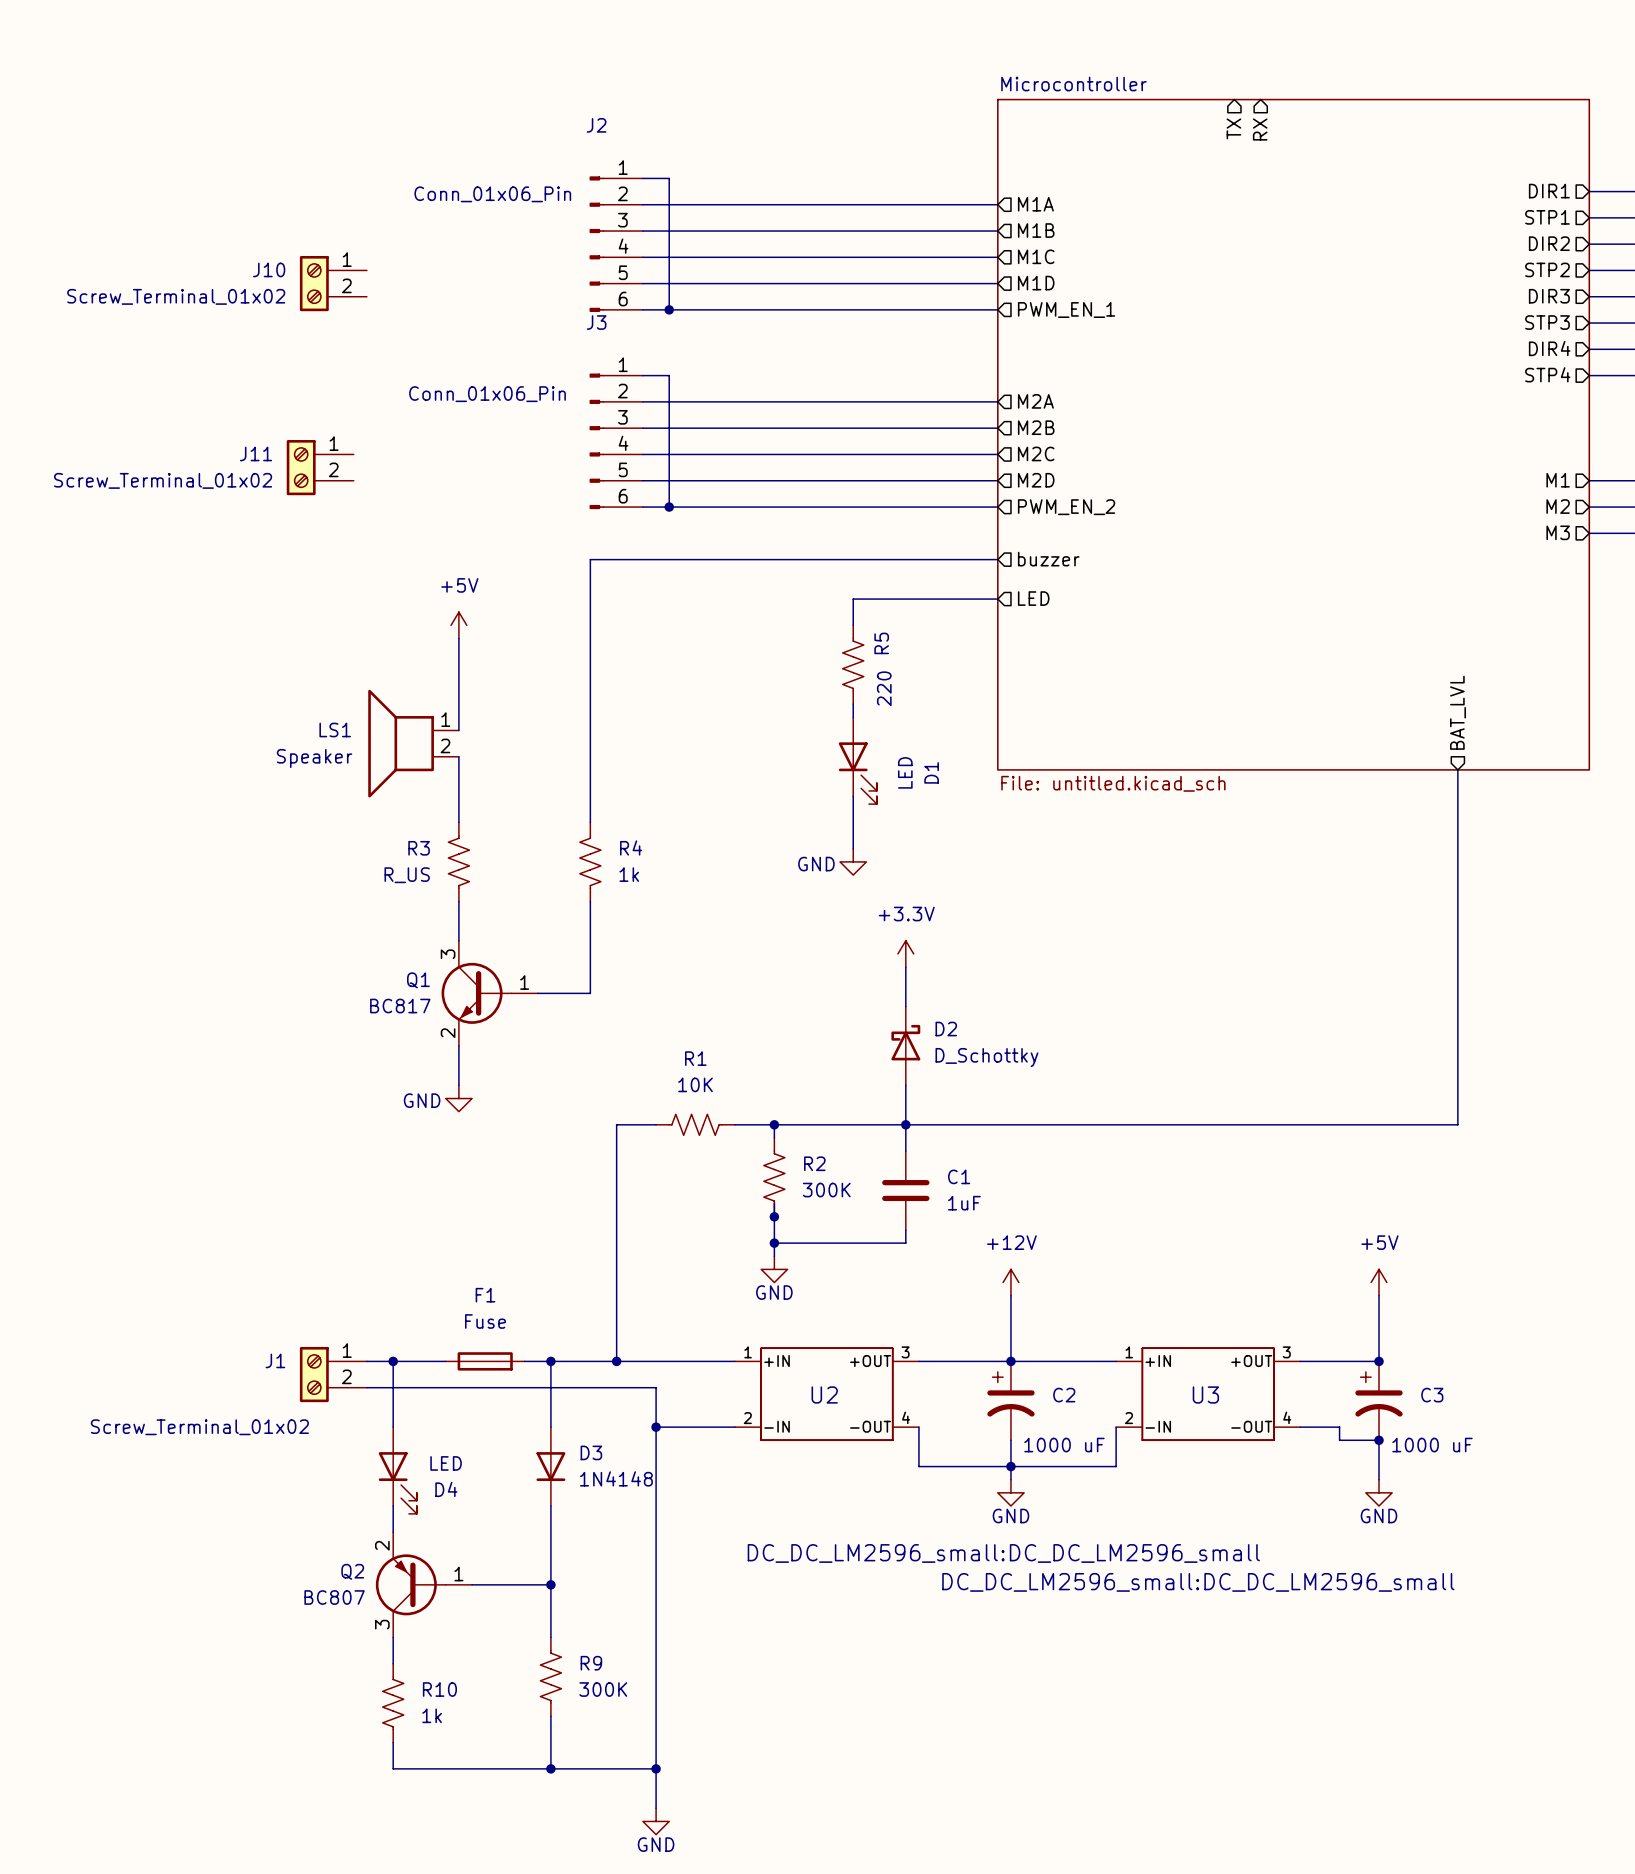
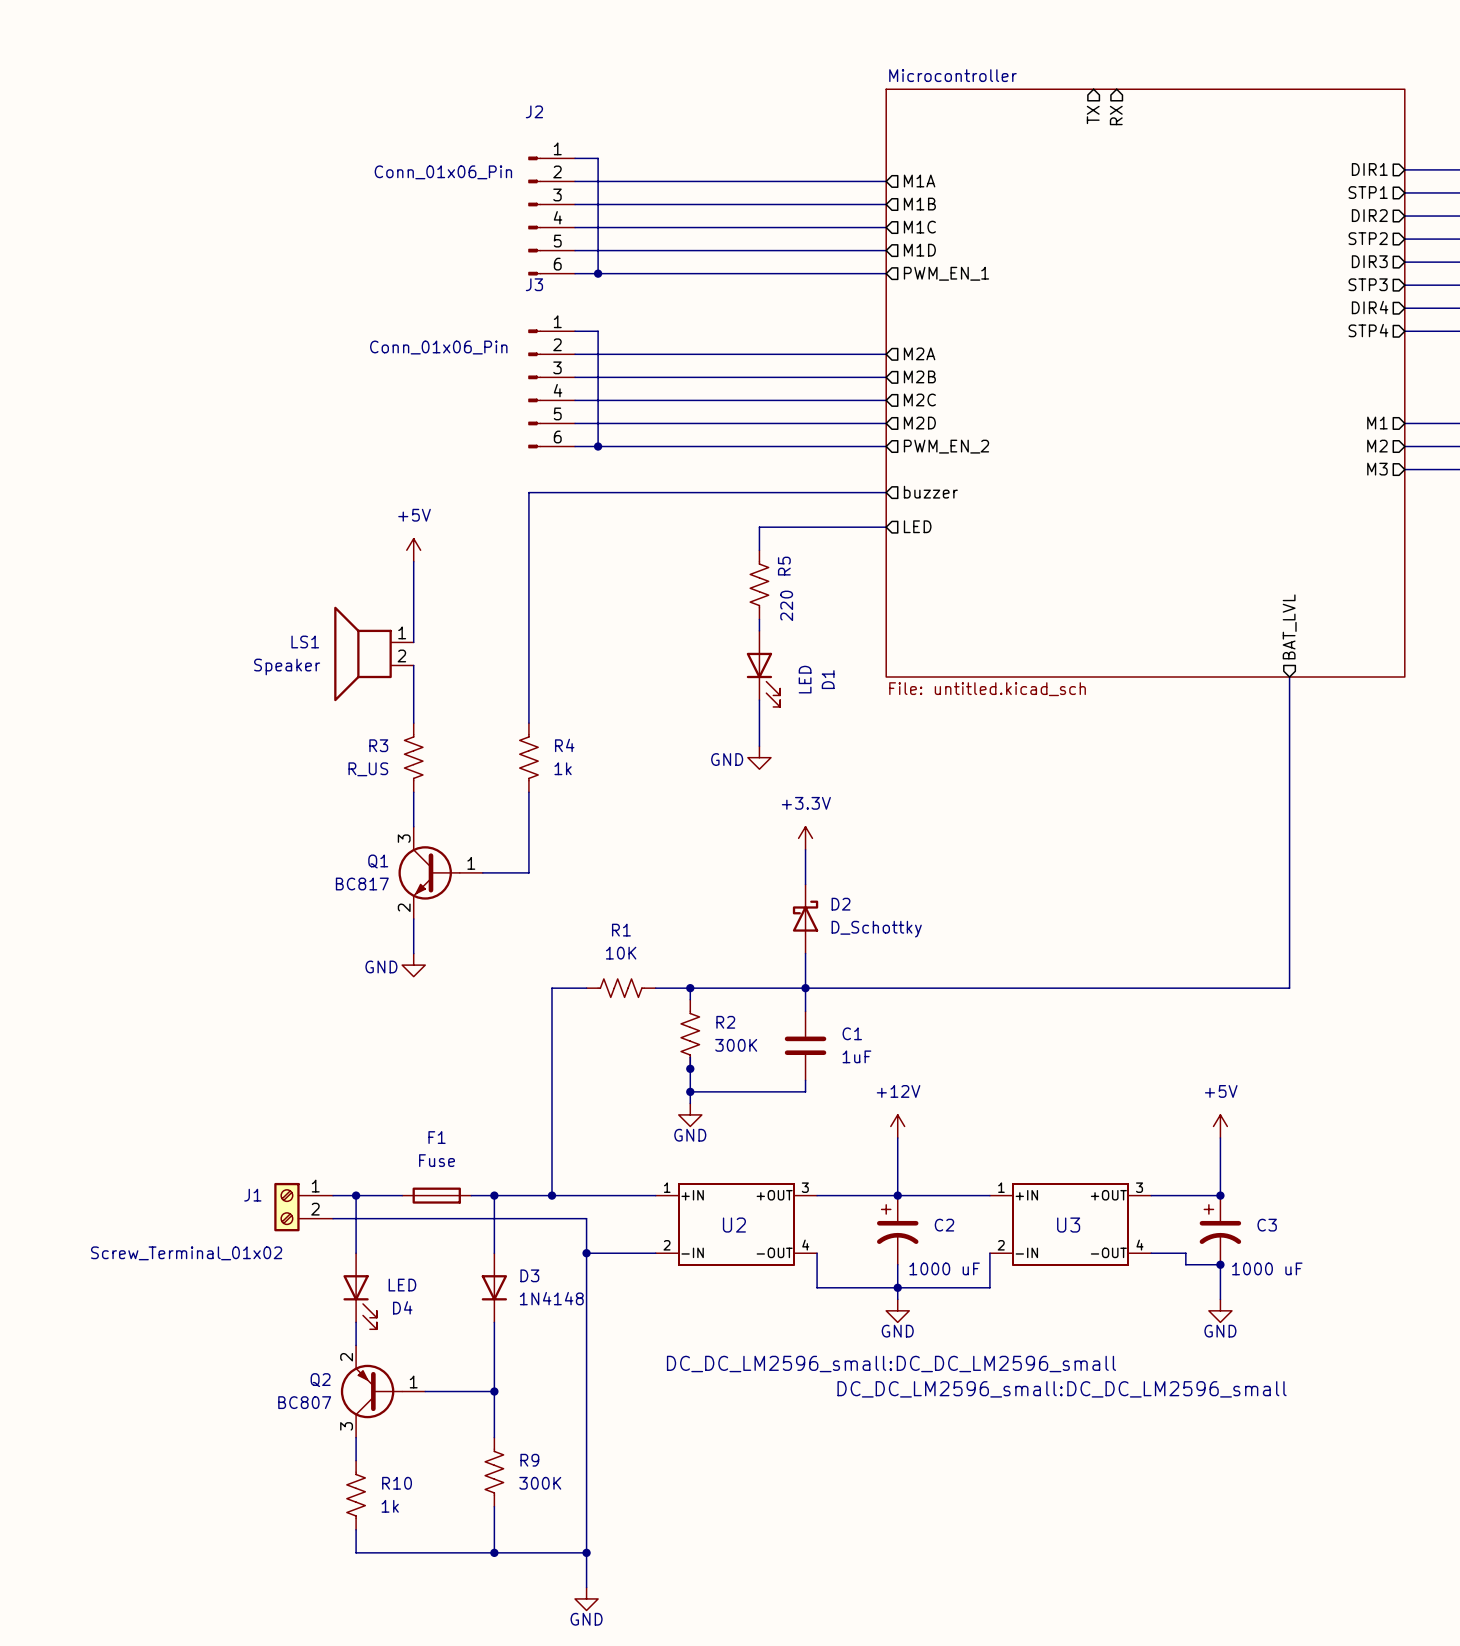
J10: Screw_Terminal_01x02 (333, 283) -> none
J11: Screw_Terminal_01x02 (320, 467) -> none

